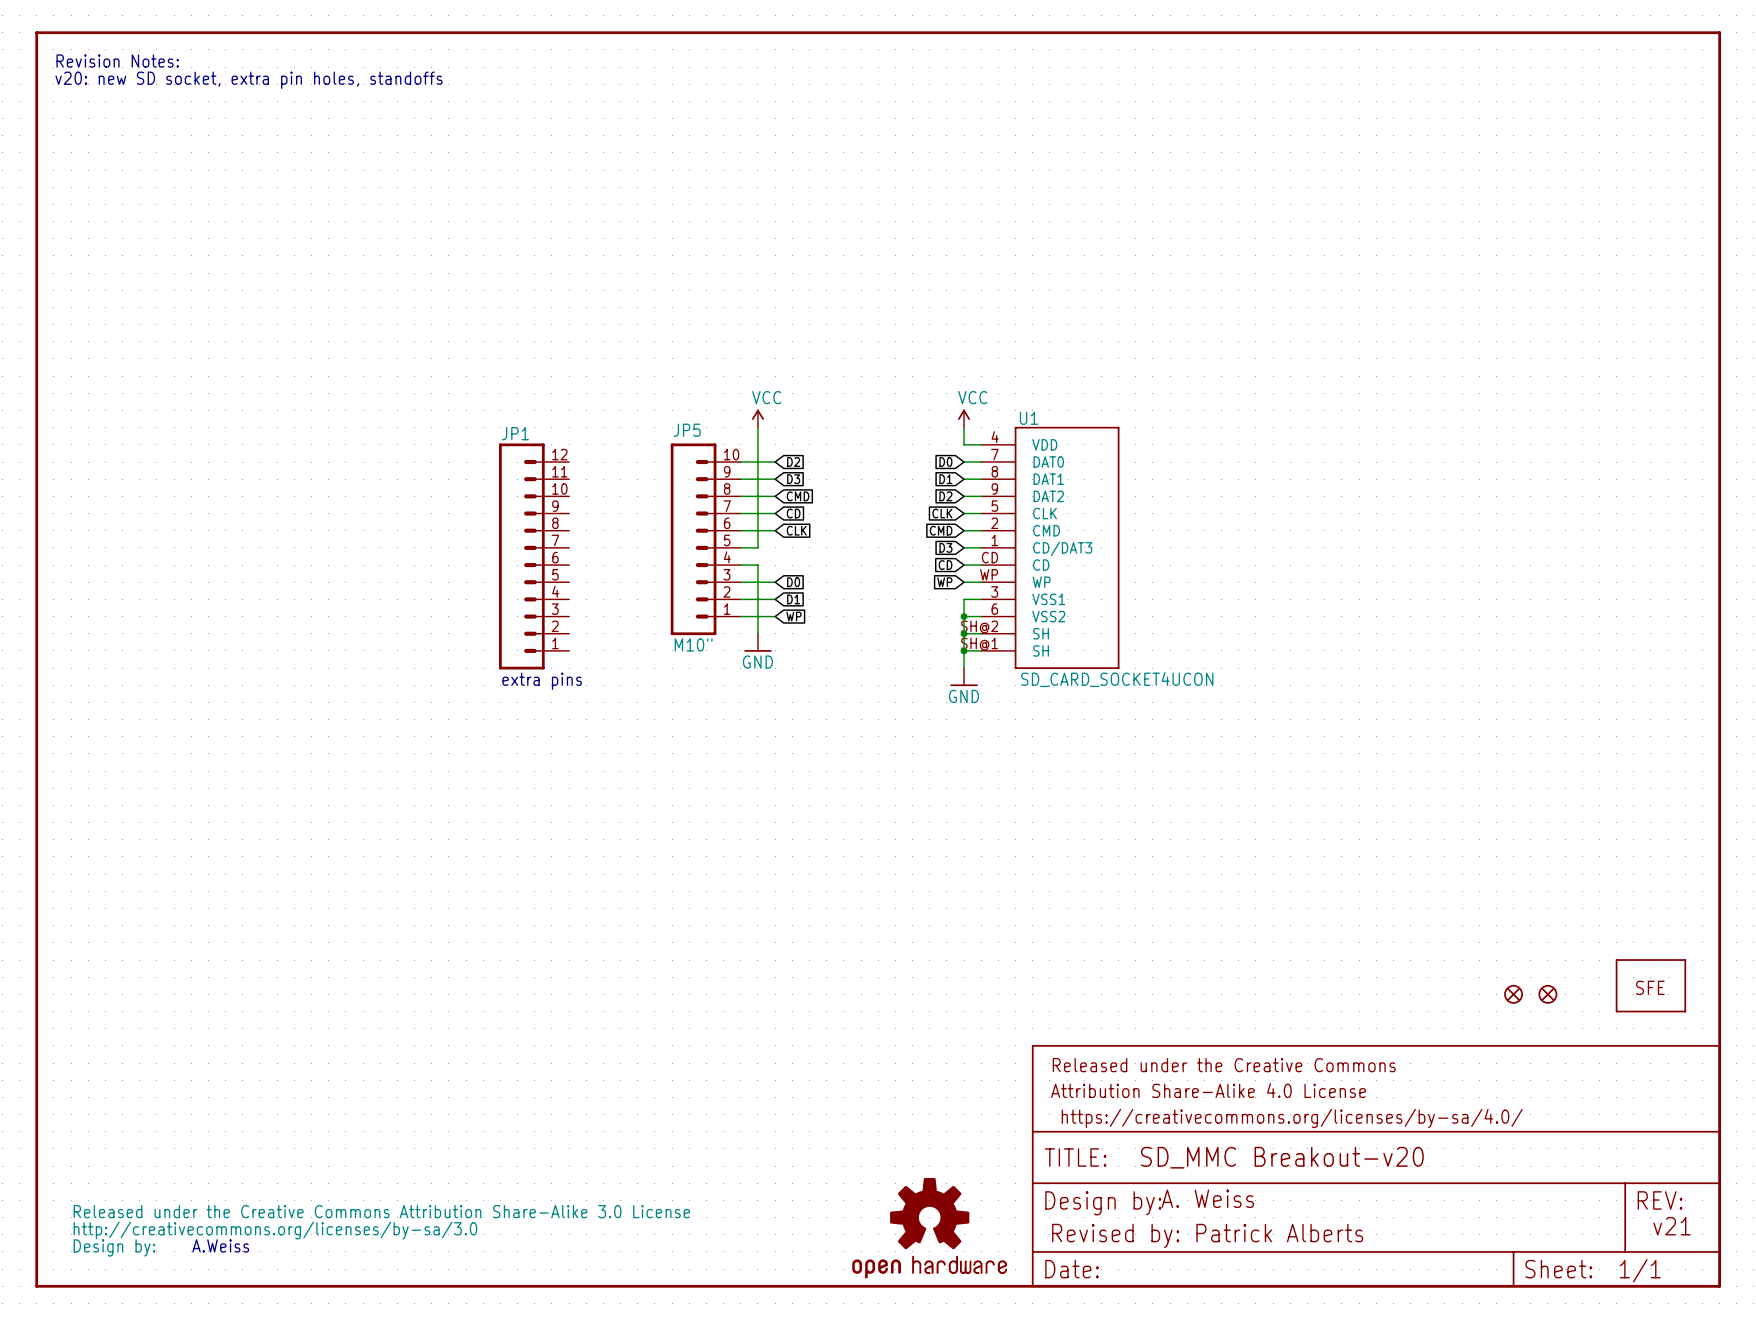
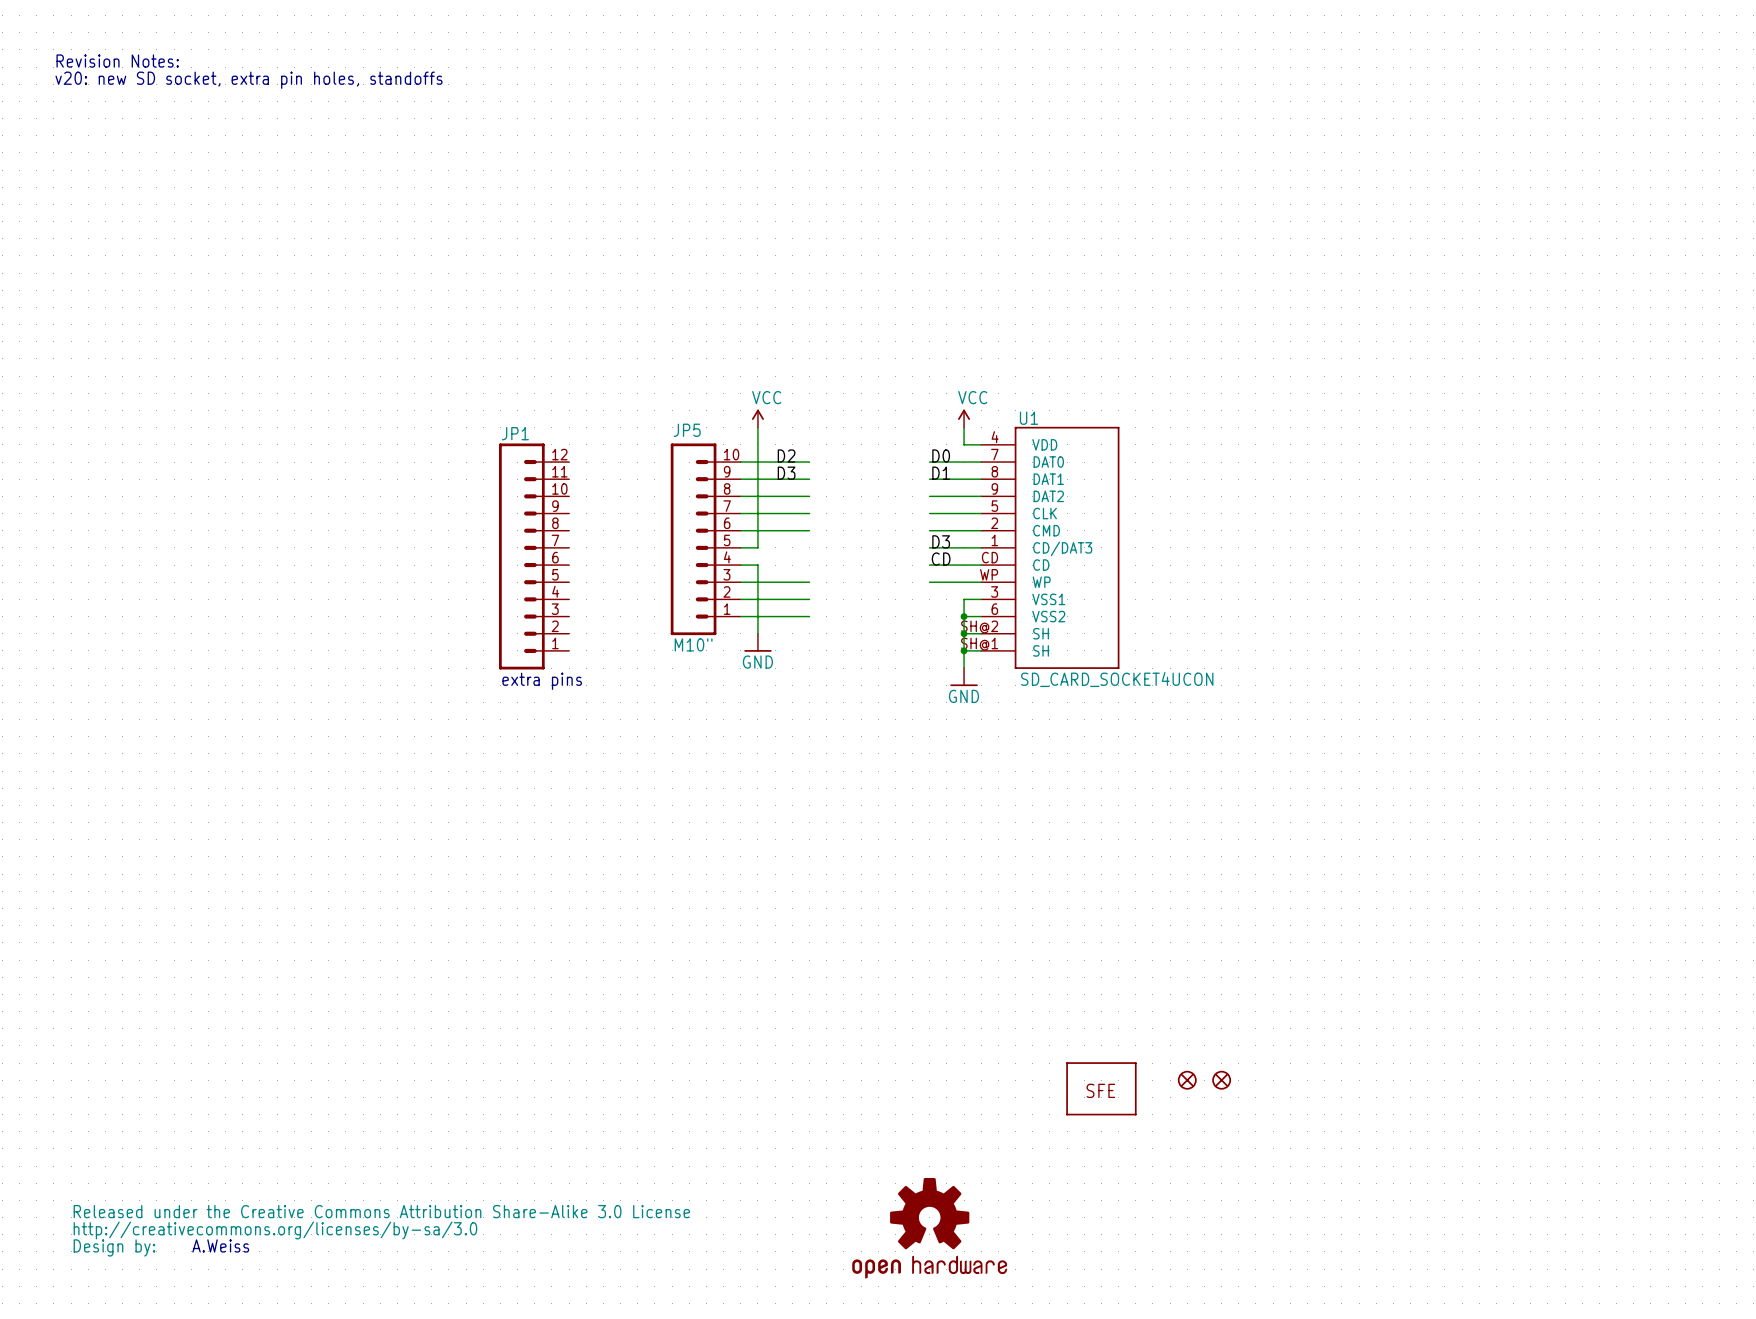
label: none -> D2 (786, 456)
label: none -> D0 (941, 456)
wire: none -> (775, 462) (809, 462)
global label: D2 (793, 462) -> none
wire: none -> (929, 462) (964, 462)
global label: D0 (945, 462) -> none
label: none -> D3 (786, 473)
label: none -> D1 (941, 473)
wire: none -> (775, 479) (809, 479)
global label: D3 (793, 479) -> none
wire: none -> (929, 479) (964, 479)
global label: D1 (945, 479) -> none
wire: none -> (775, 496) (809, 496)
global label: CMD (798, 496) -> none
wire: none -> (929, 496) (964, 496)
global label: D2 (945, 496) -> none
wire: none -> (775, 513) (809, 513)
global label: CD (793, 513) -> none
wire: none -> (929, 513) (964, 513)
global label: CLK (942, 513) -> none
wire: none -> (775, 530) (809, 530)
global label: CLK (796, 530) -> none
wire: none -> (929, 530) (964, 530)
global label: CMD (941, 530) -> none
label: none -> D3 (941, 541)
wire: none -> (929, 547) (964, 547)
global label: D3 (945, 547) -> none
label: none -> CD (941, 559)
wire: none -> (929, 565) (964, 565)
global label: CD (945, 565) -> none
wire: none -> (775, 582) (809, 582)
global label: D0 (793, 582) -> none
wire: none -> (929, 582) (964, 582)
global label: WP (944, 582) -> none
wire: none -> (775, 599) (809, 599)
global label: D1 (793, 599) -> none
wire: none -> (775, 616) (809, 616)
global label: WP (793, 616) -> none
part: (878, 659) -> none
part: (1650, 985) -> none
part: (1513, 994) -> none
part: (1547, 994) -> none
part: none -> (1187, 1080)
part: none -> (1221, 1080)
part: none -> (1101, 1088)
part: (1376, 1166) -> none
text: A. Weiss (1207, 1198) -> none
text: v21 (1672, 1226) -> none
text: Revised by: Patrick Alberts (1207, 1235) -> none

